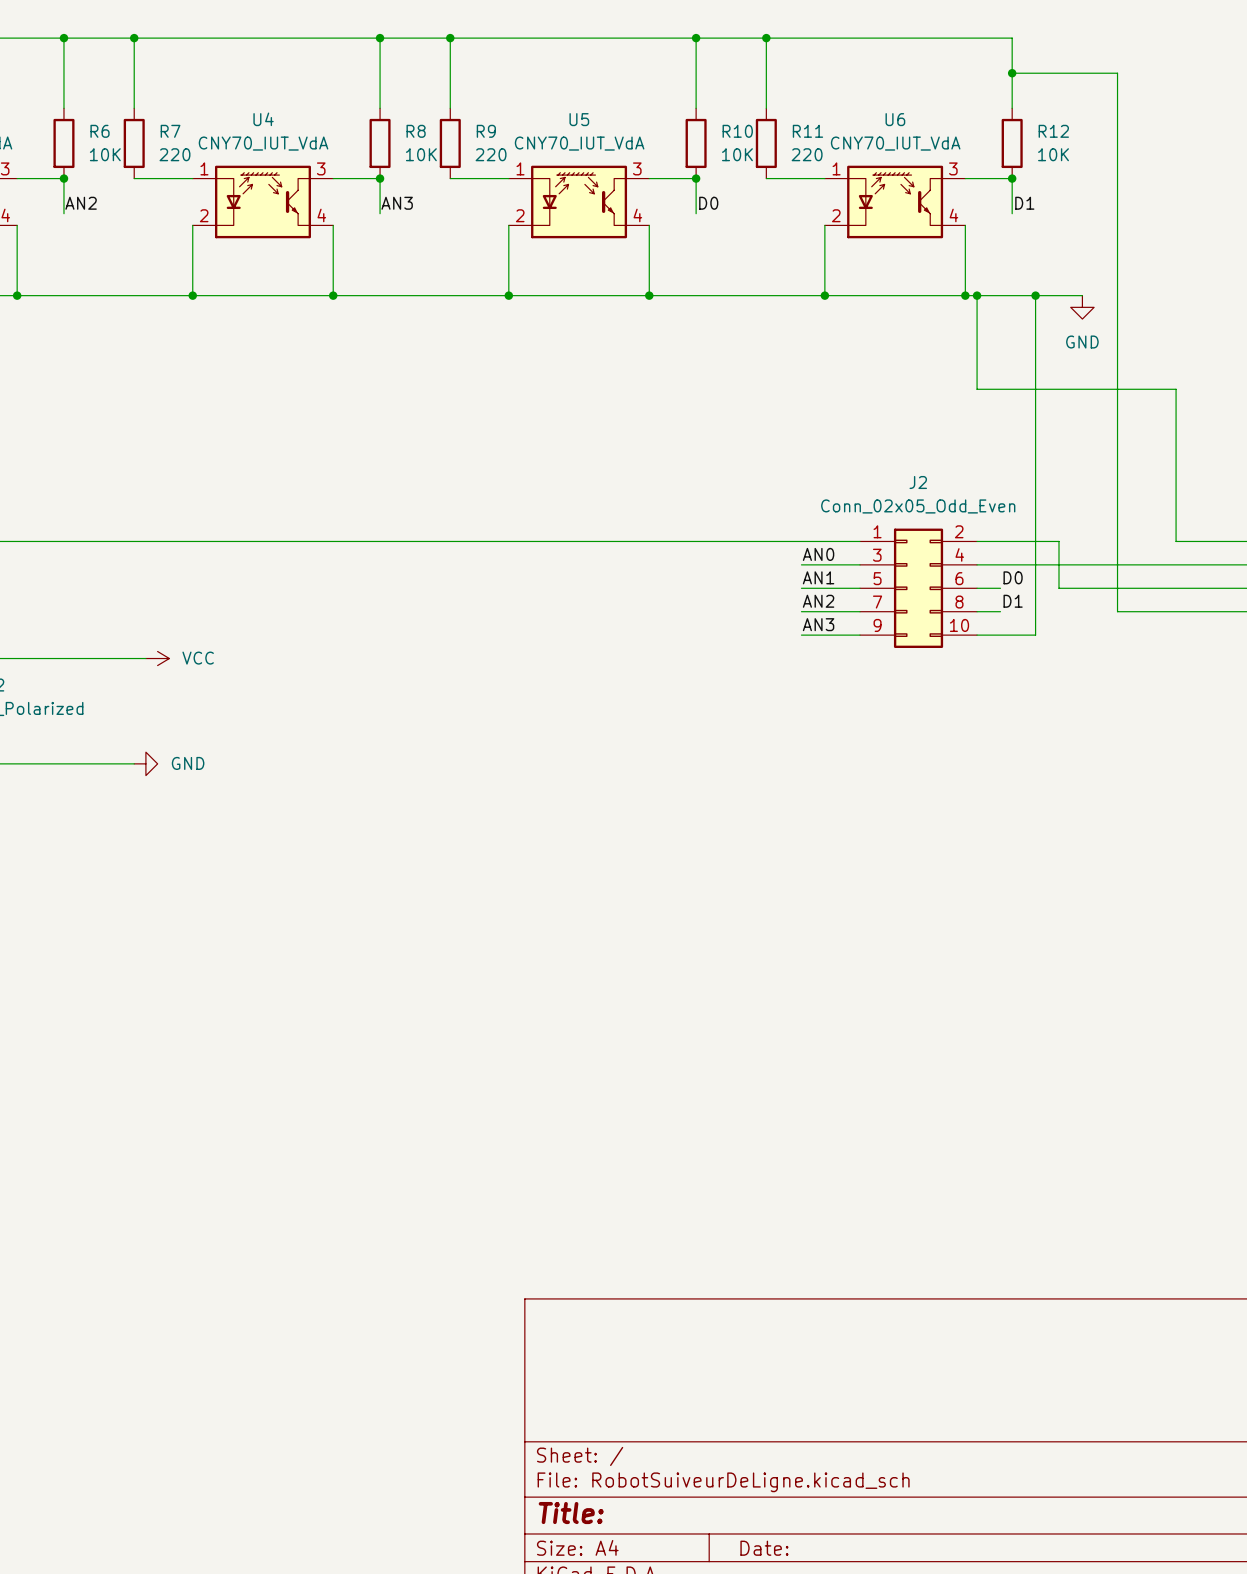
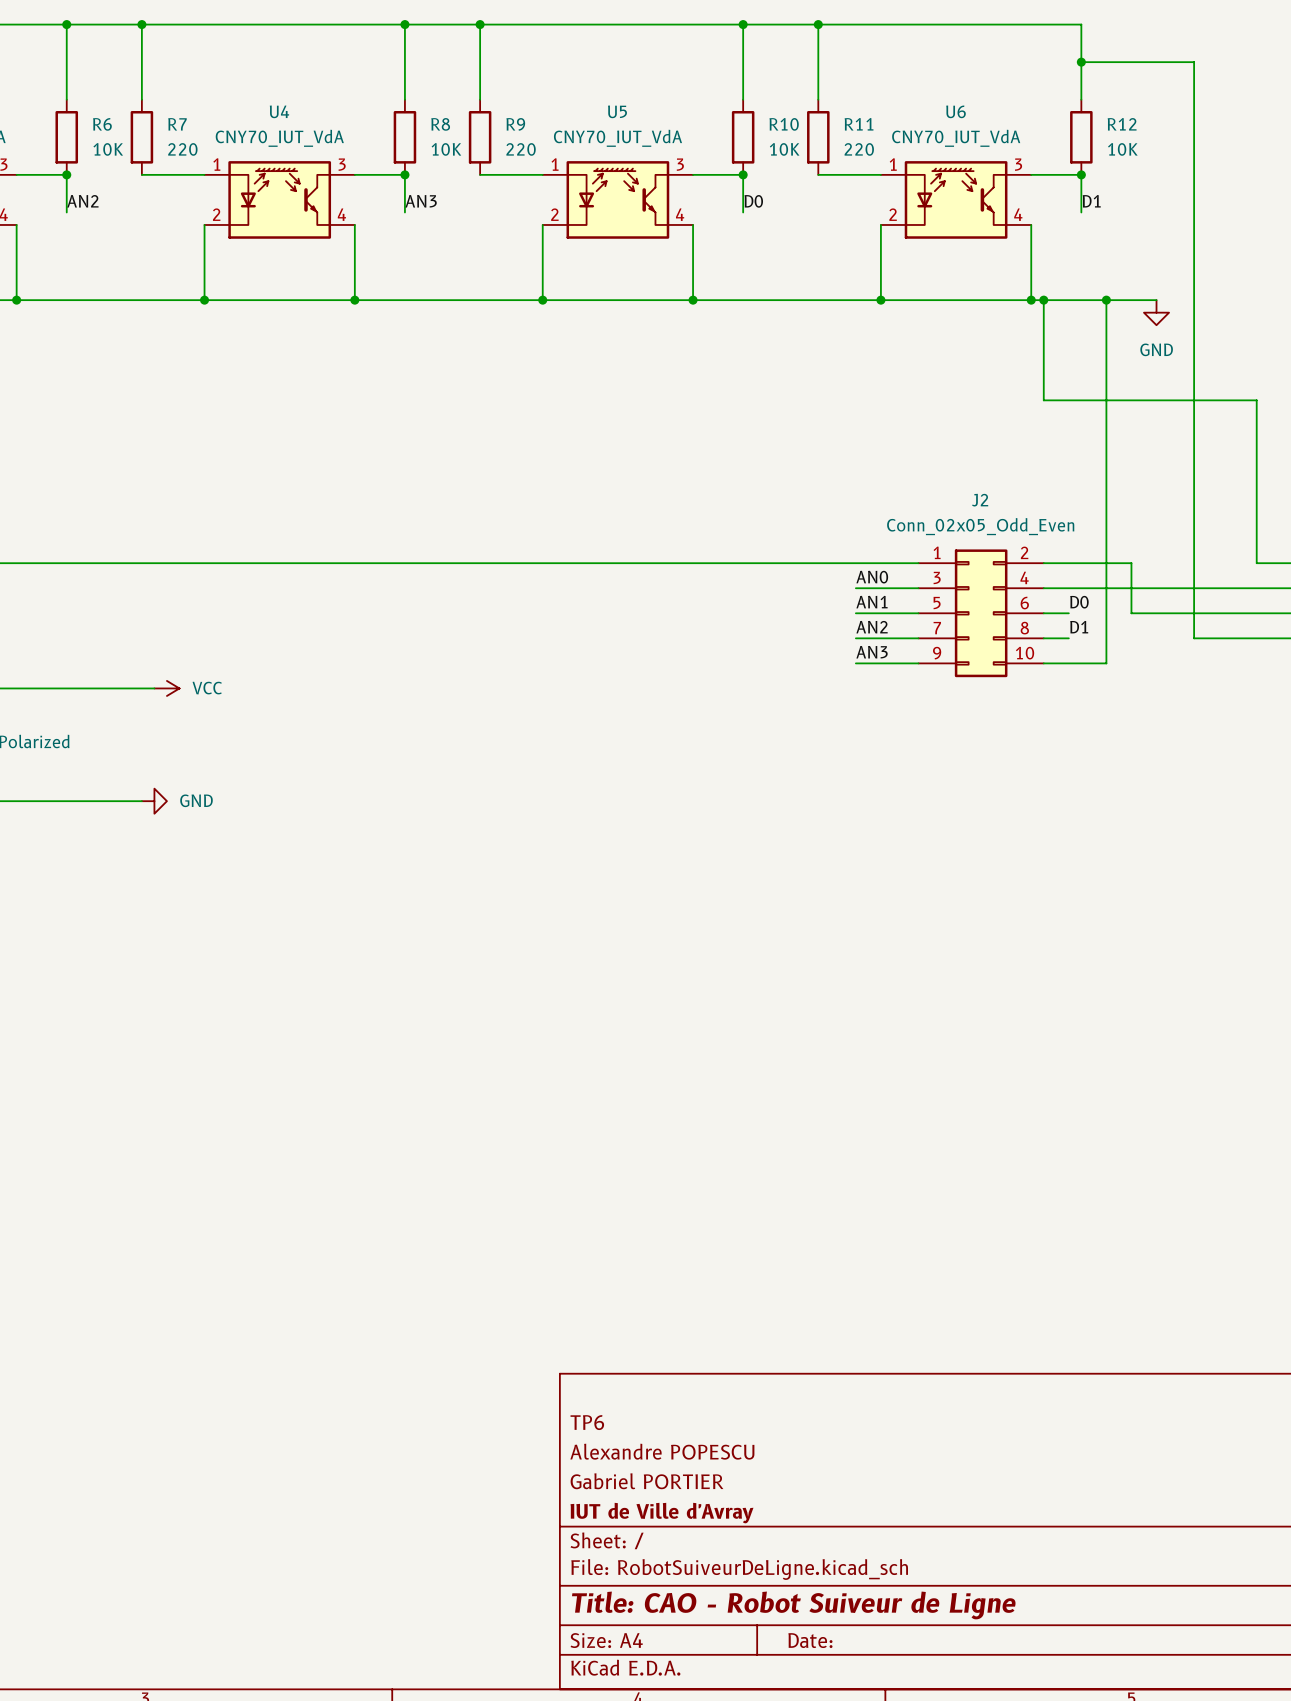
title block: none -> TP6 (587, 1422)
title block: none -> Alexandre POPESCU (662, 1451)
title block: none -> Gabriel PORTIER (647, 1481)
title block: none -> IUT de Ville d'Avray (661, 1513)
title block: Title: (571, 1513) -> Title: CAO - Robot Suiveur de Ligne (793, 1605)

